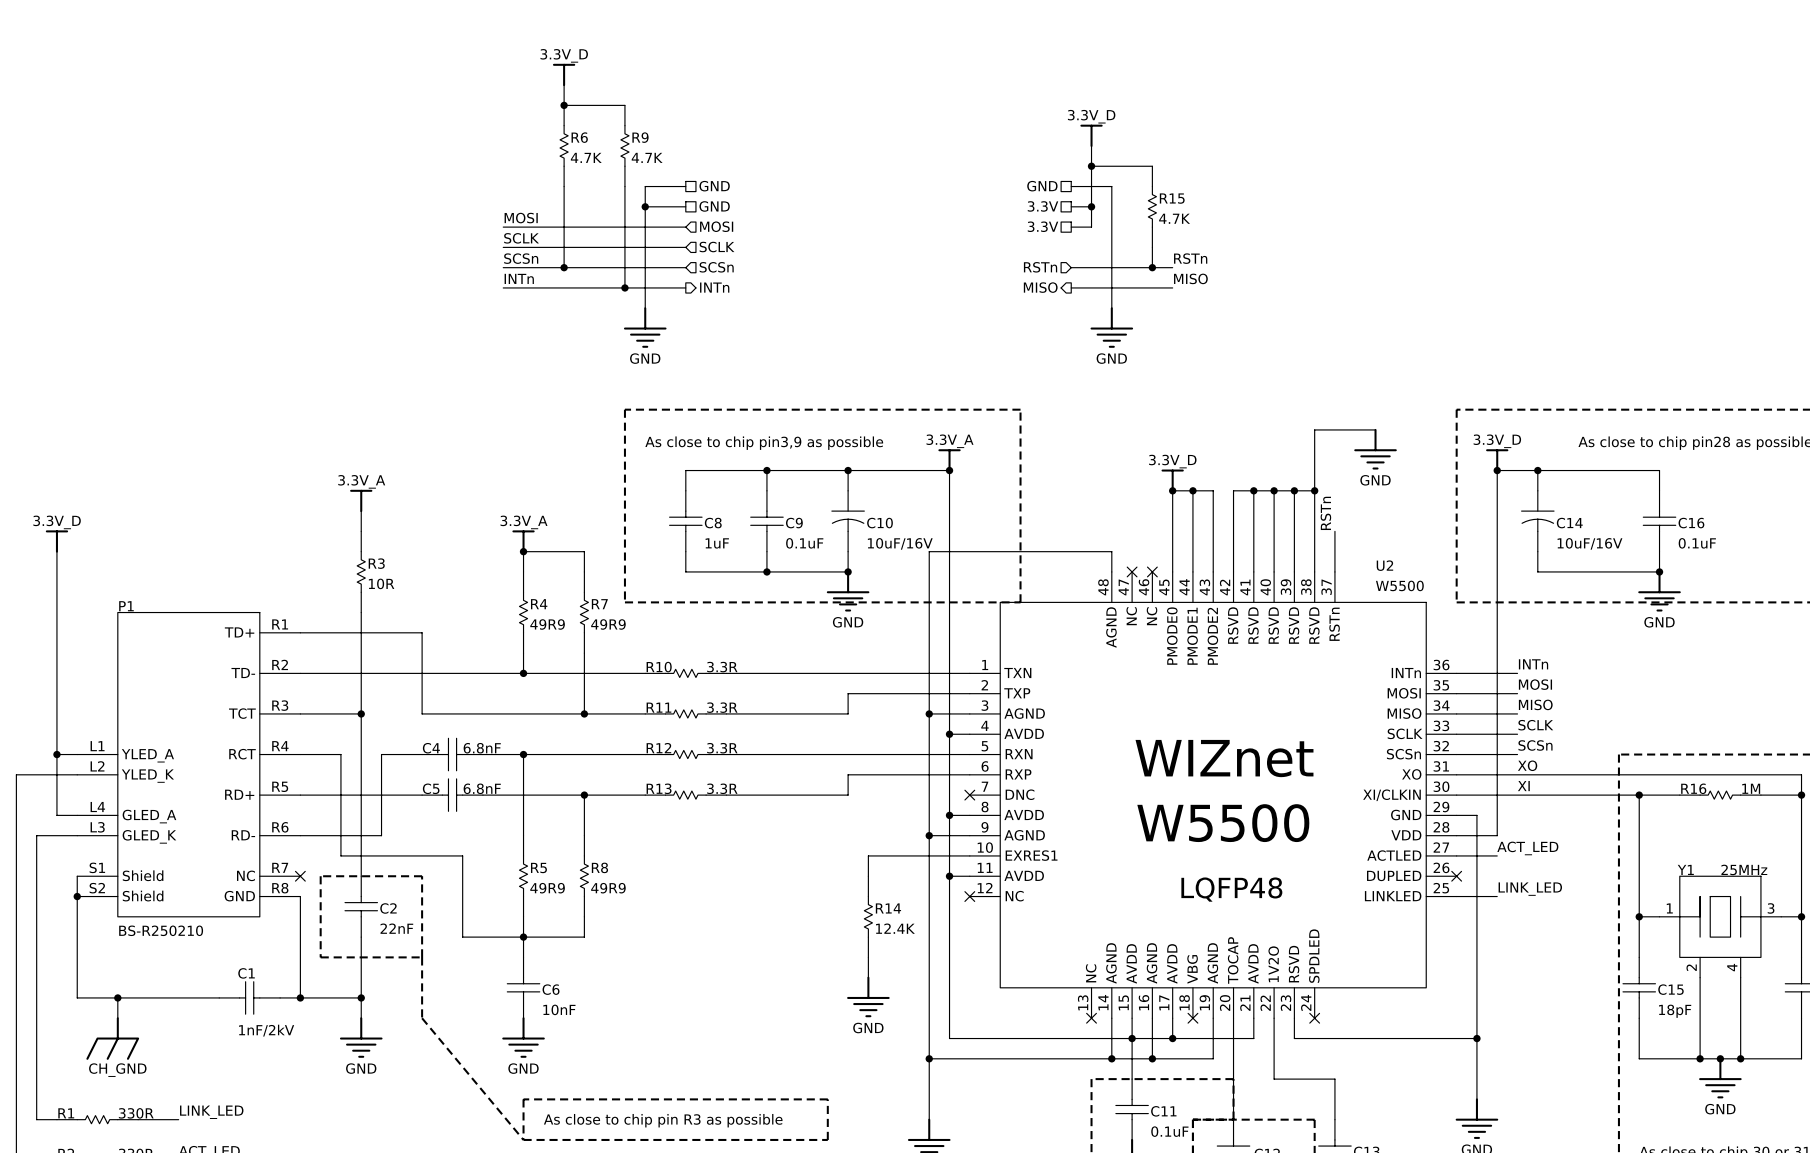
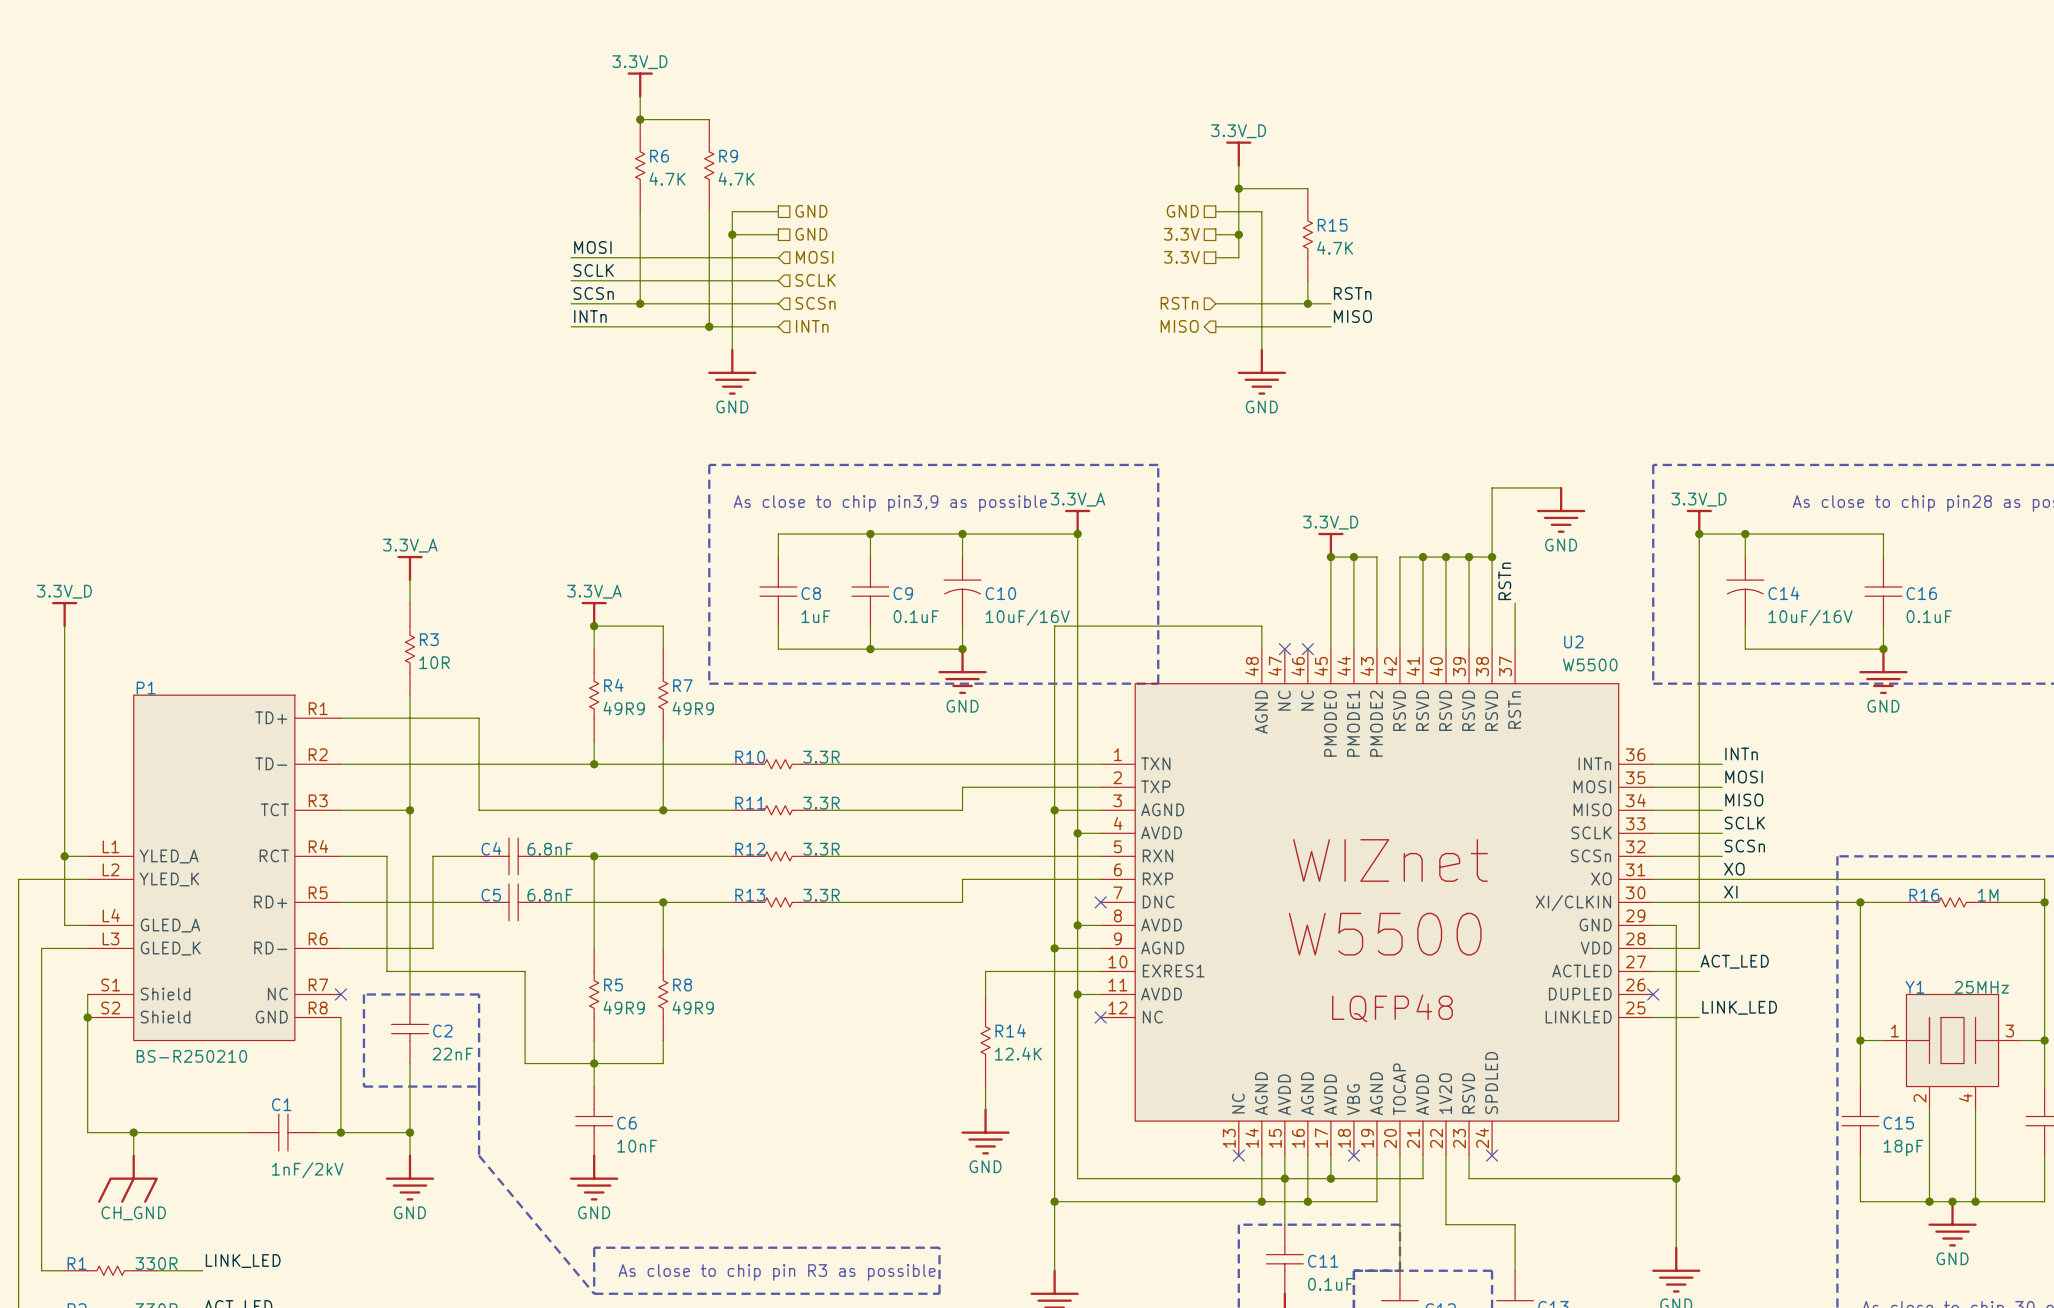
hierarchical label shape: output (714, 287) -> input (812, 326)

